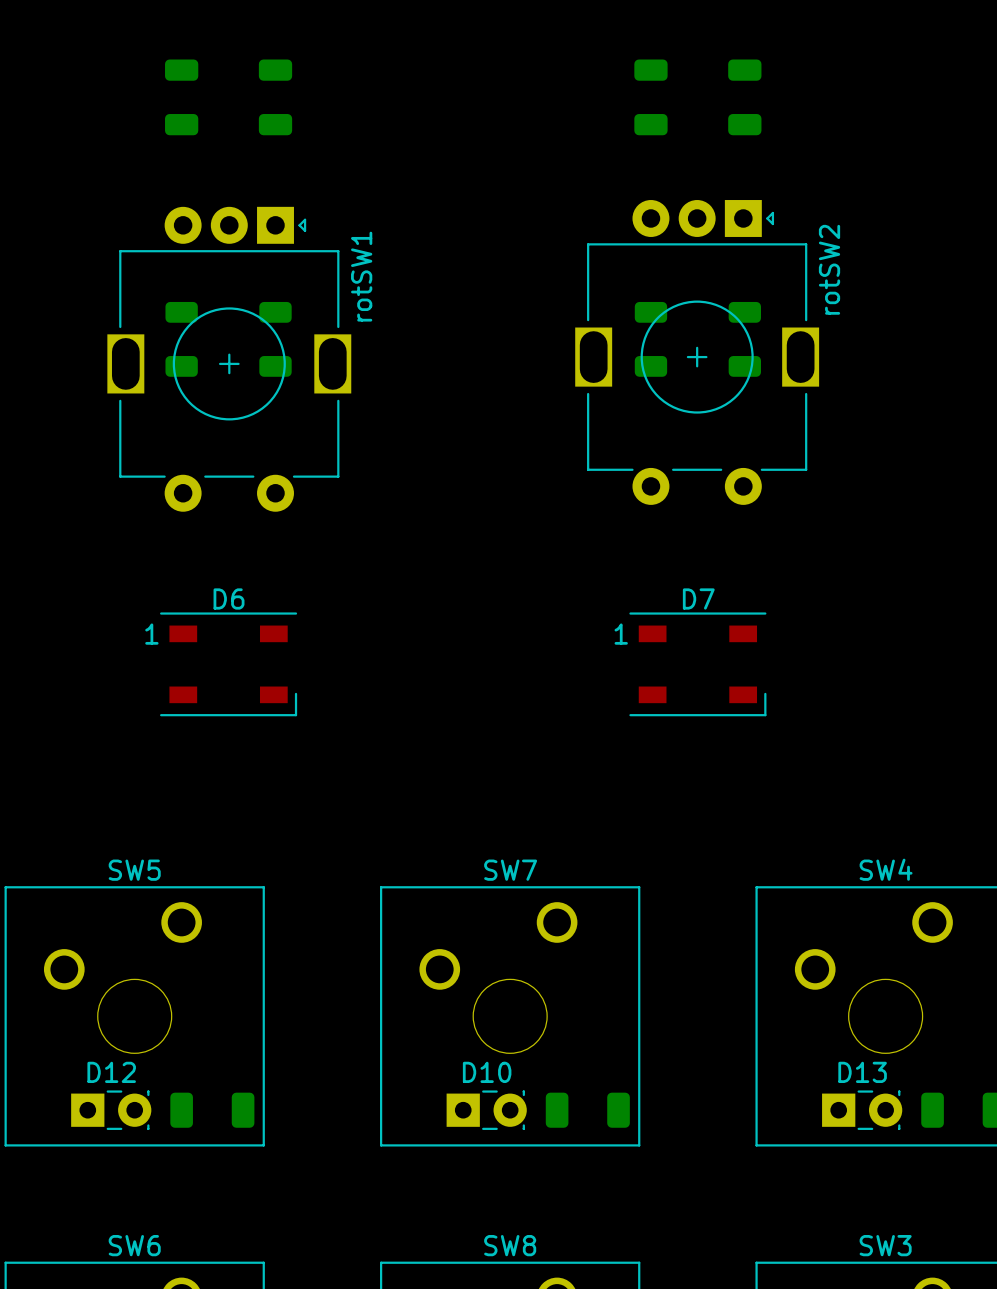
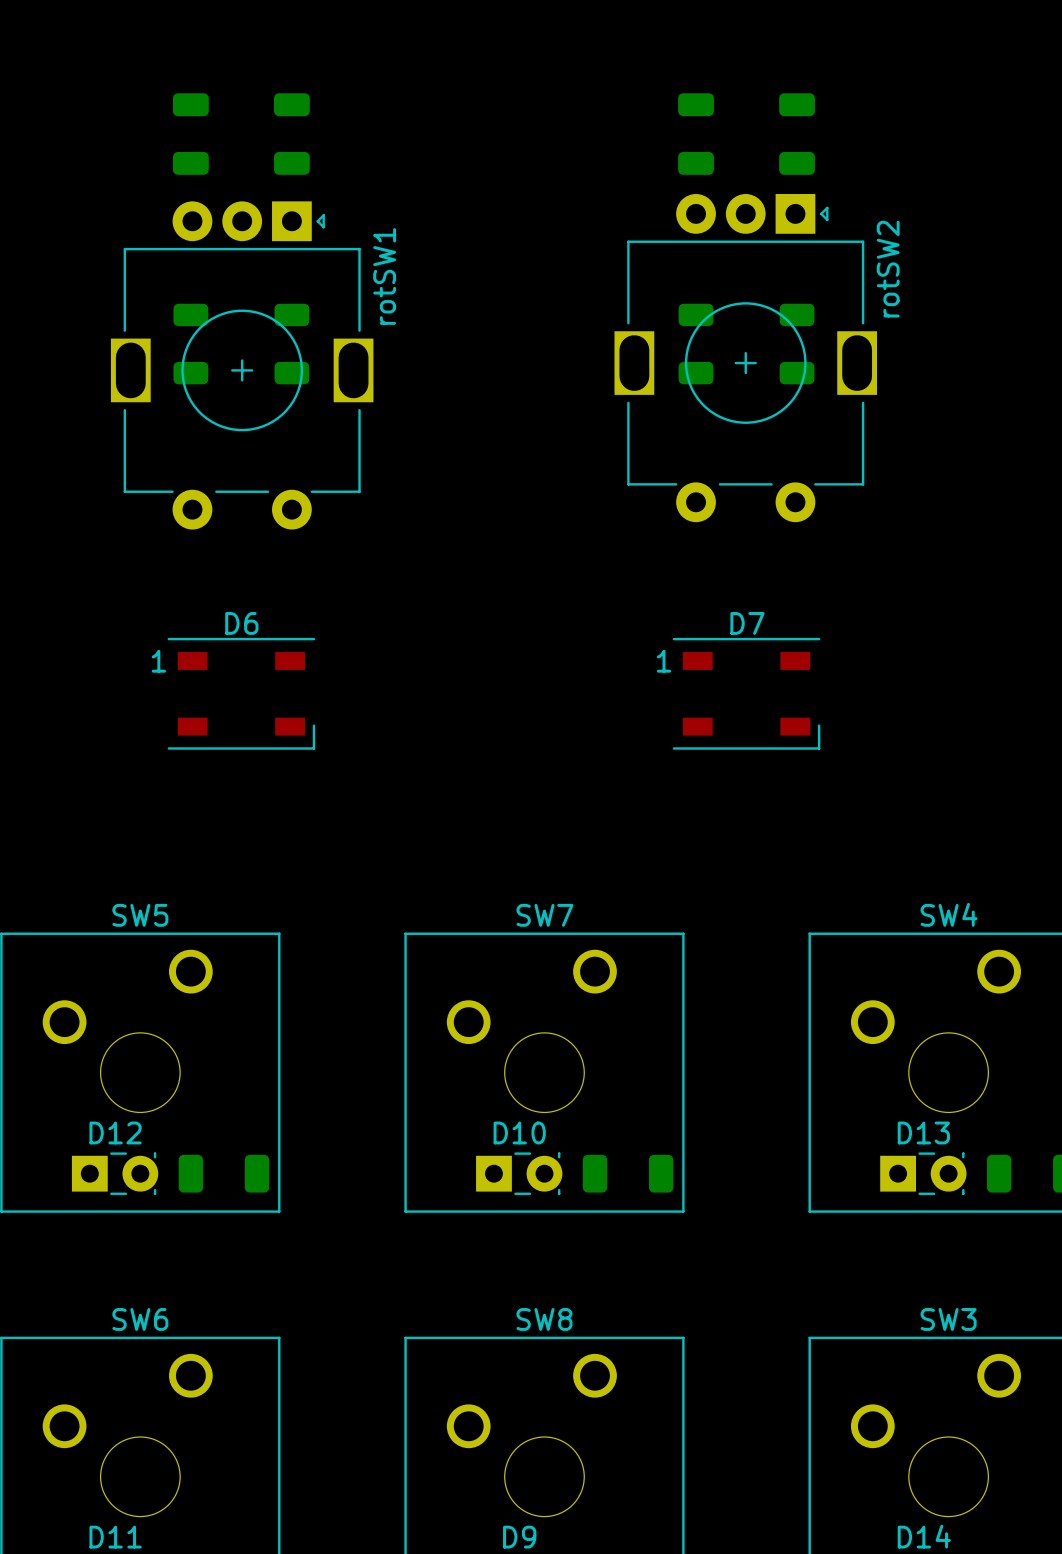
part position: (181, 97) -> (190, 134)
part position: (275, 97) -> (291, 134)
part position: (650, 97) -> (696, 134)
part position: (744, 97) -> (797, 134)

